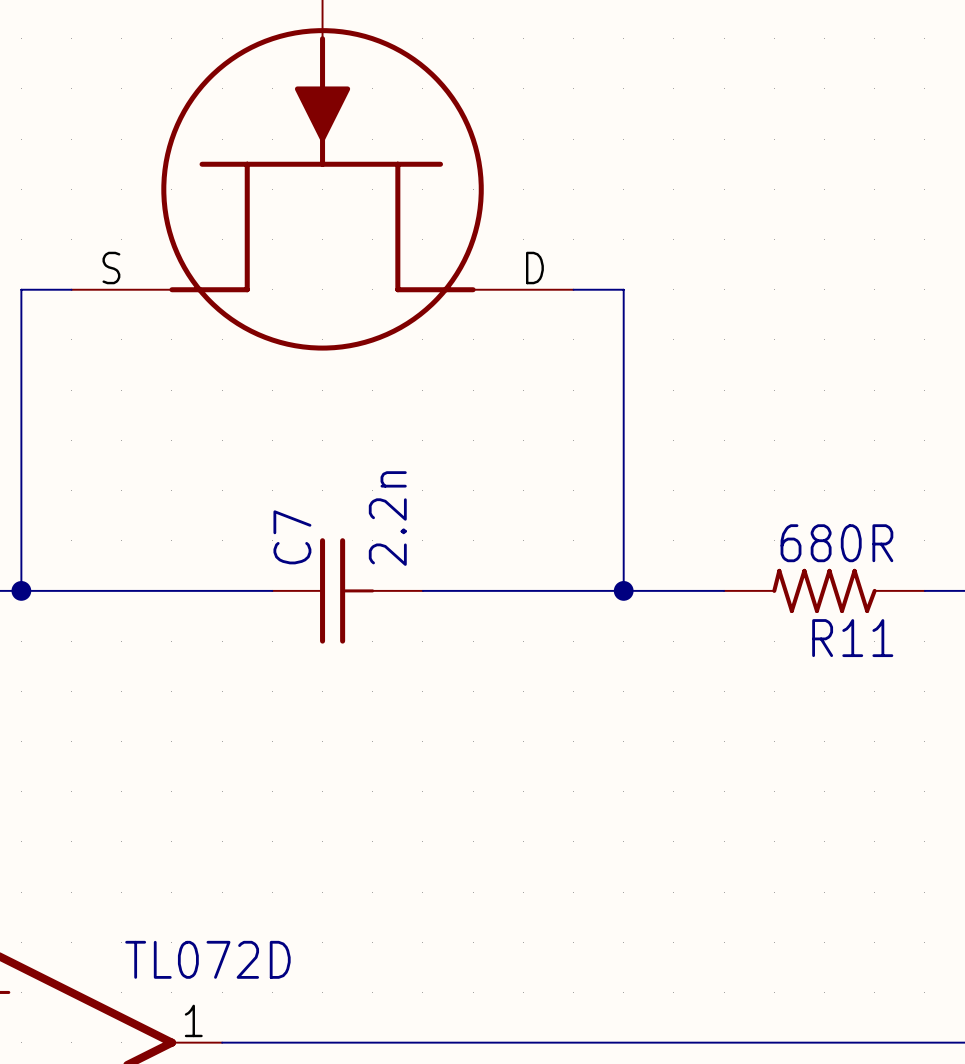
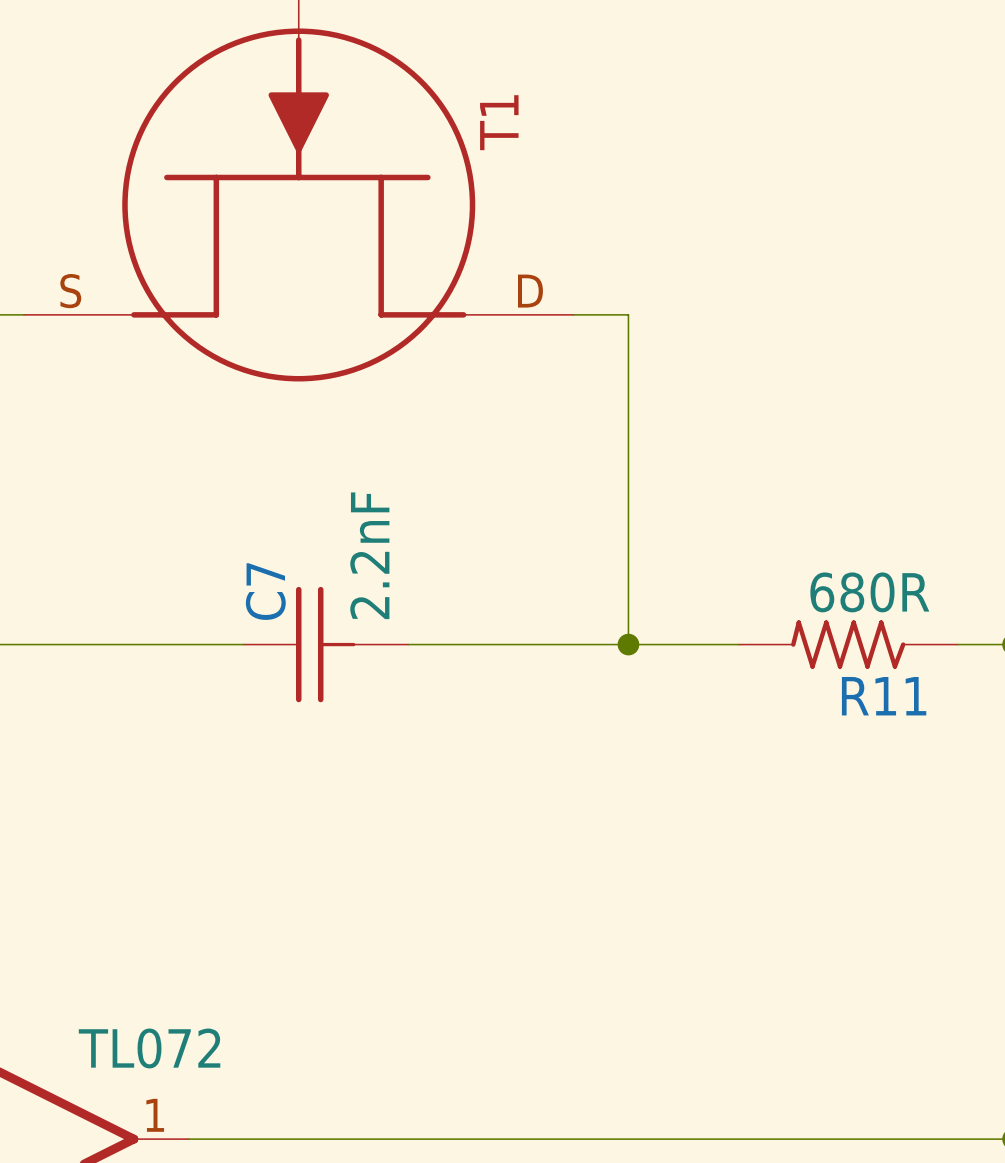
T1 name: none -> T1 (499, 122)
C7 value: 2.2n (387, 518) -> 2.2nF (369, 555)
part value: TL072D (207, 959) -> TL072 (149, 1048)

